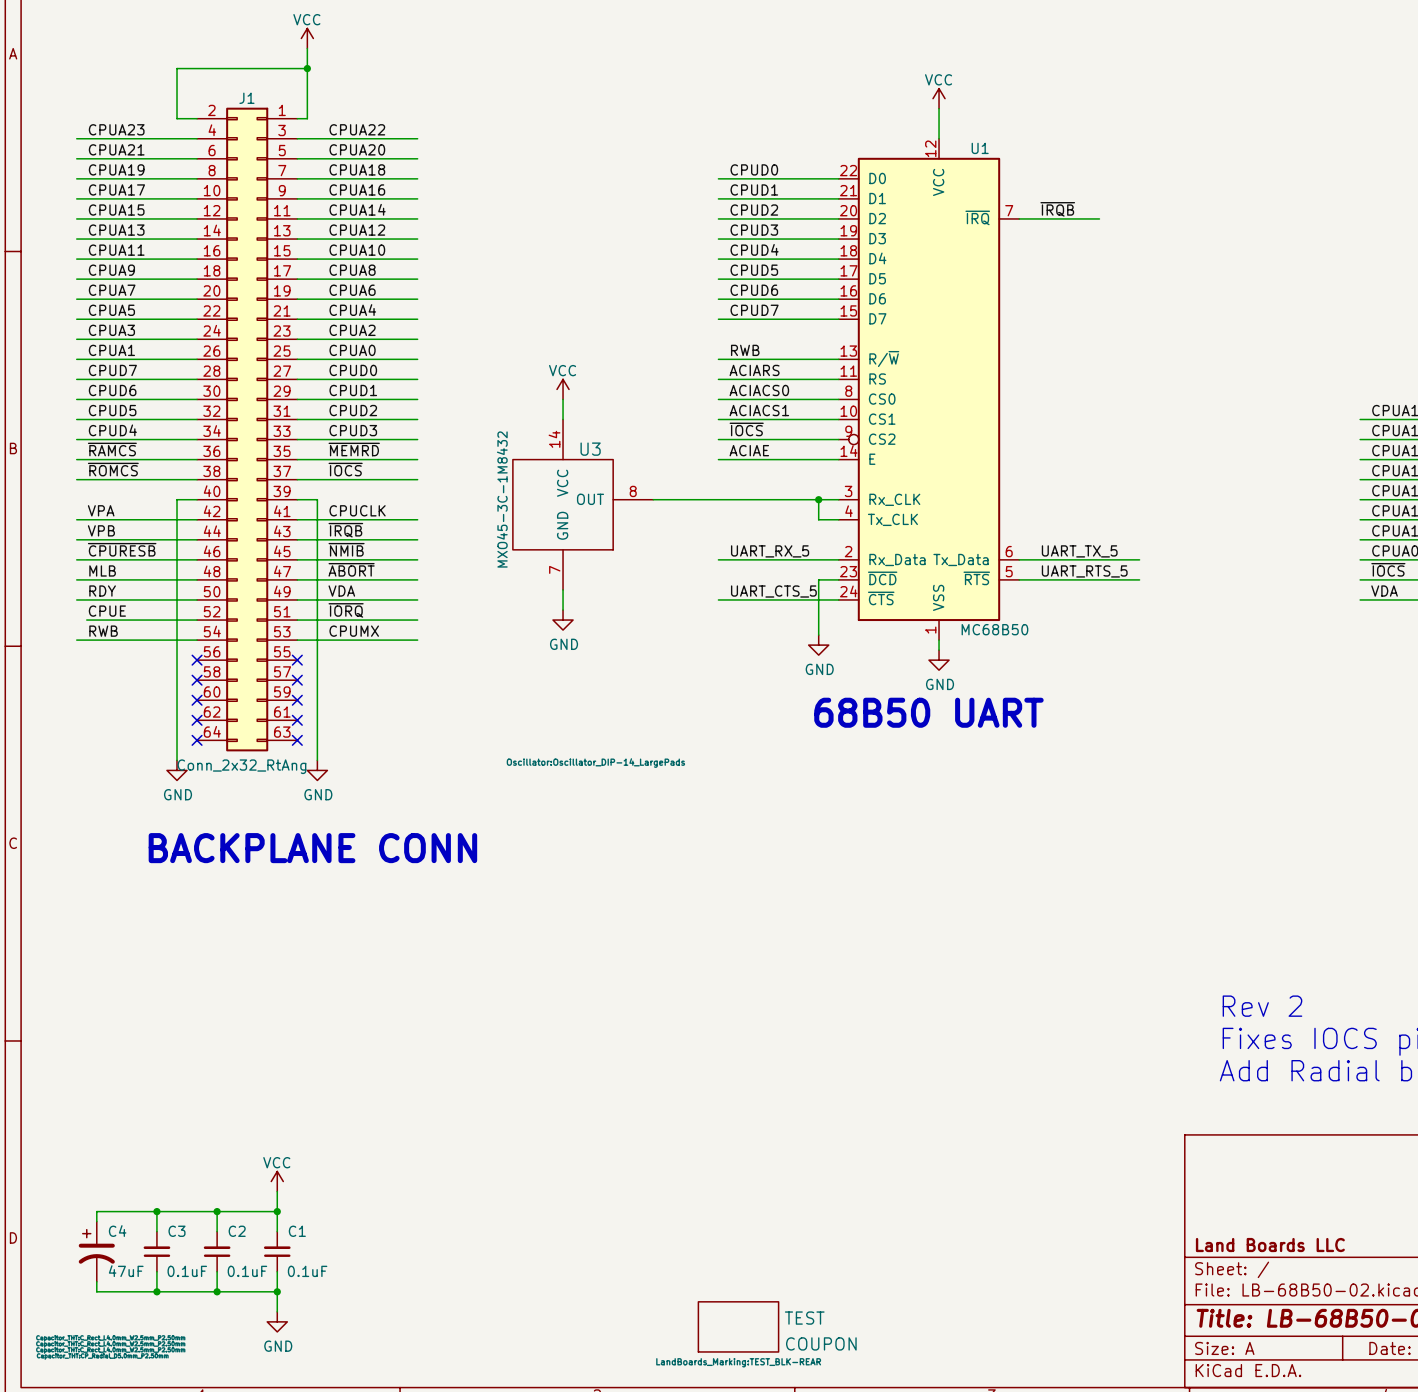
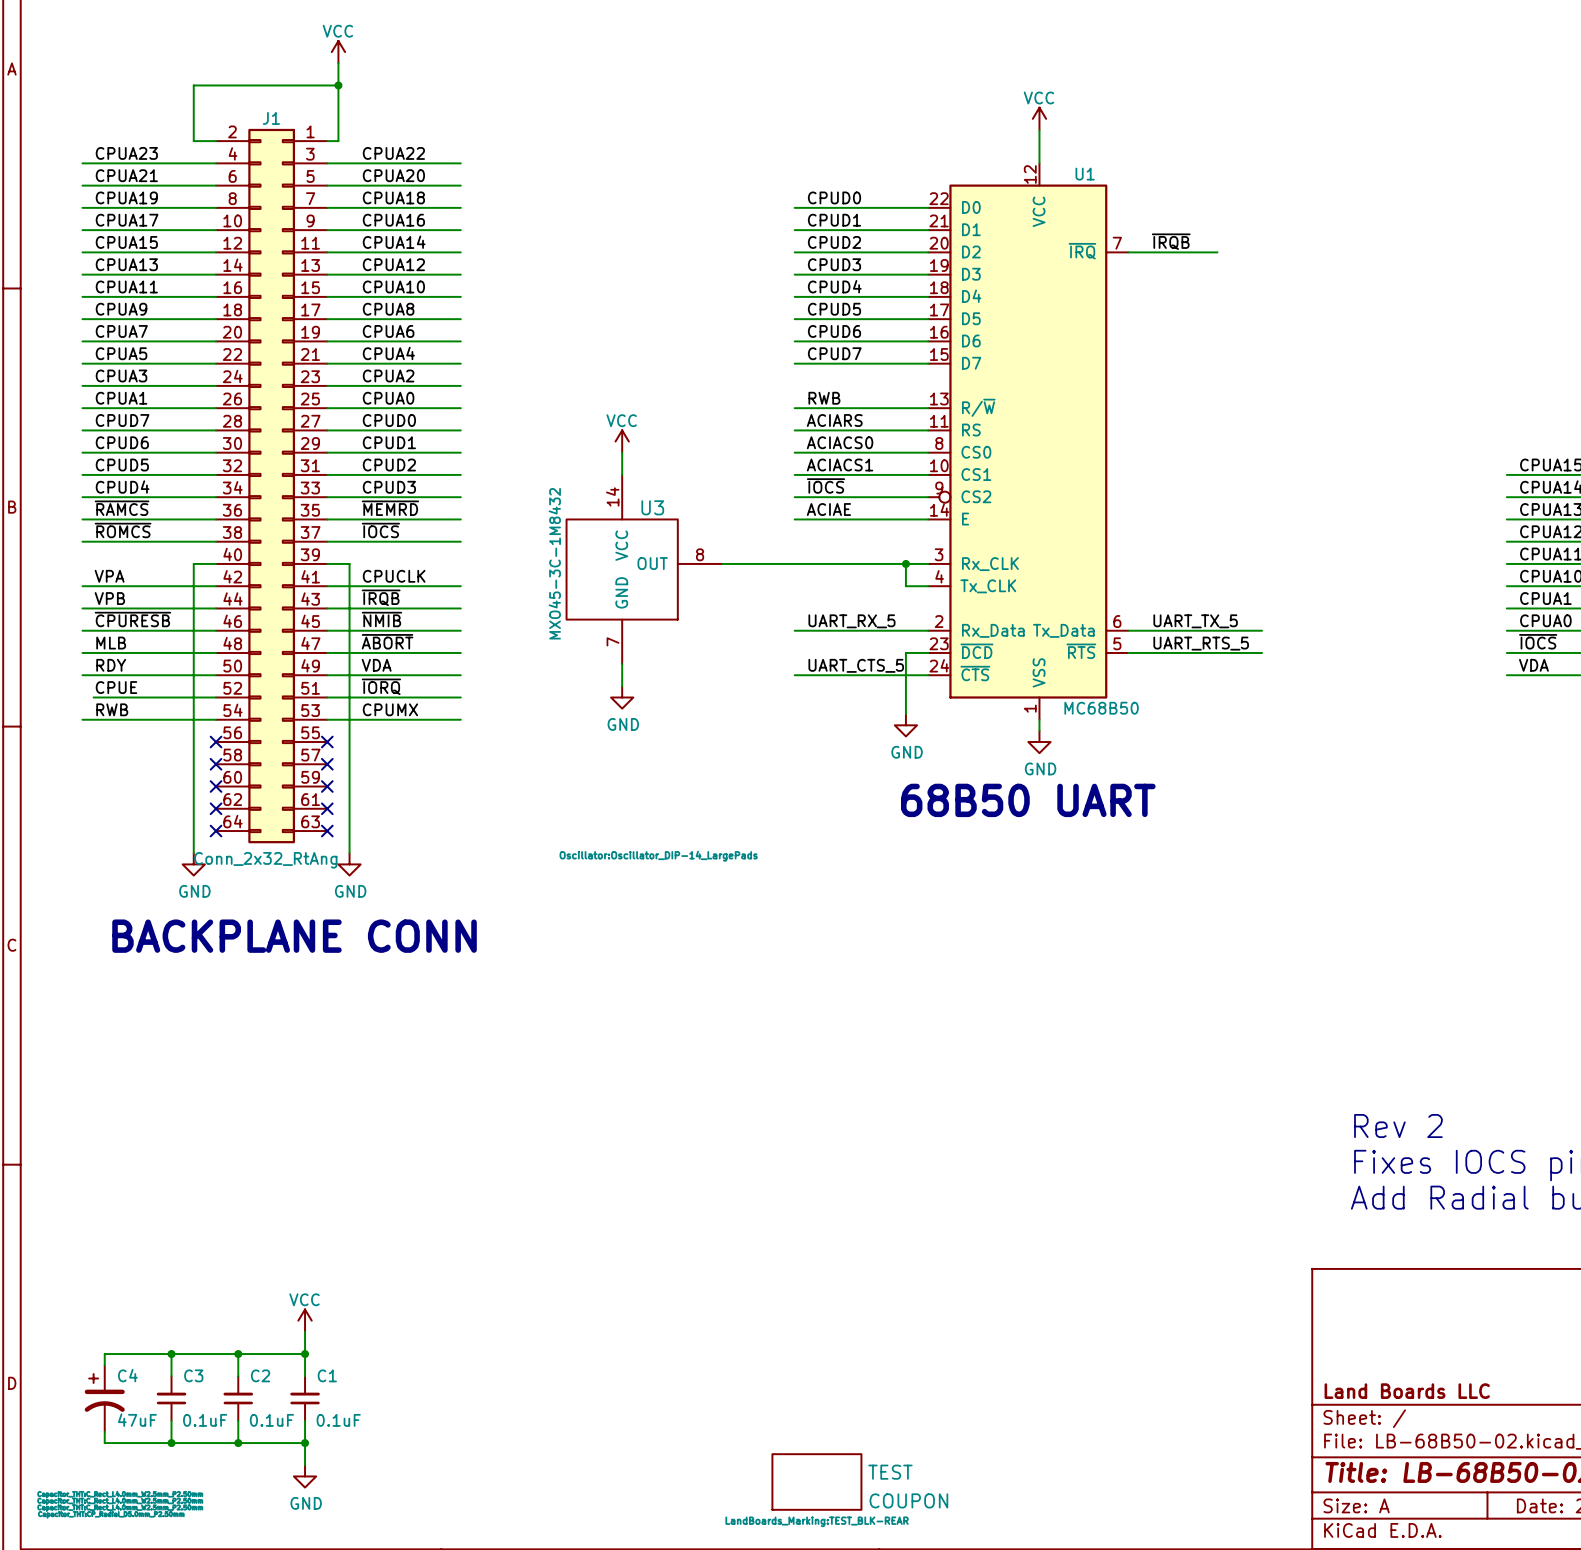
text position: BACKPLANE CONN (312, 848) -> BACKPLANE CONN (294, 936)

